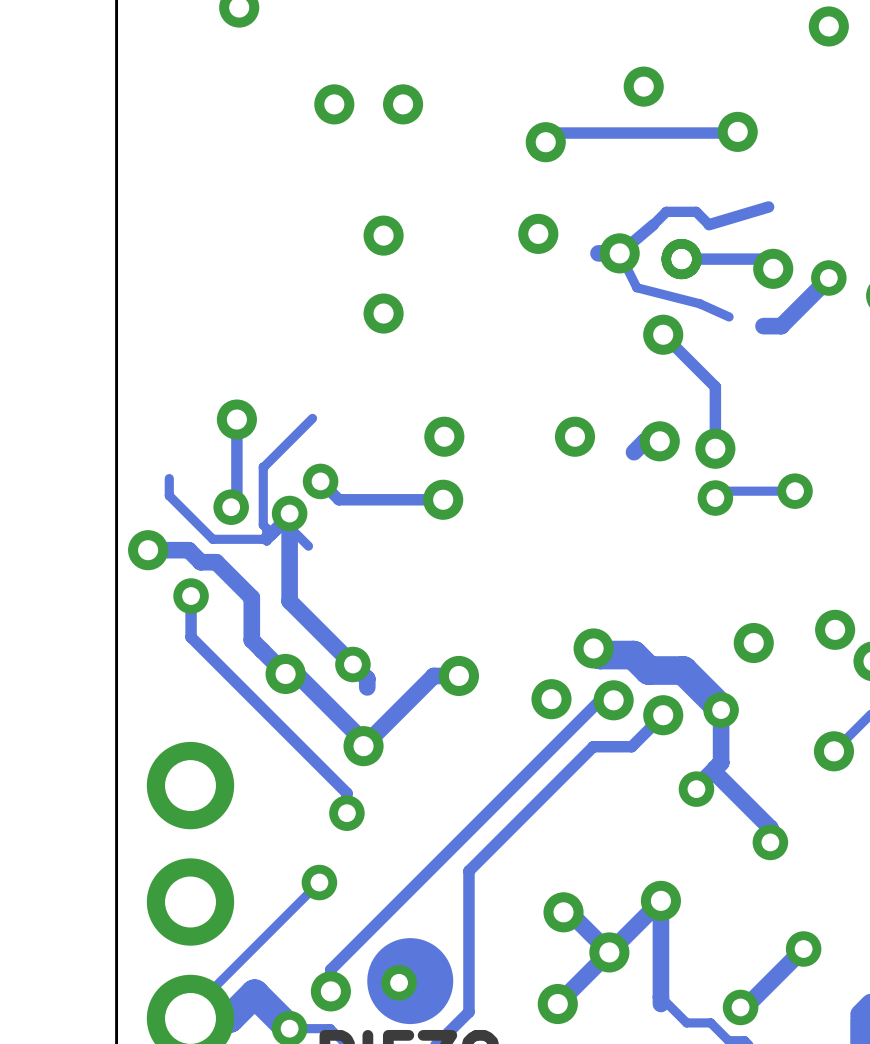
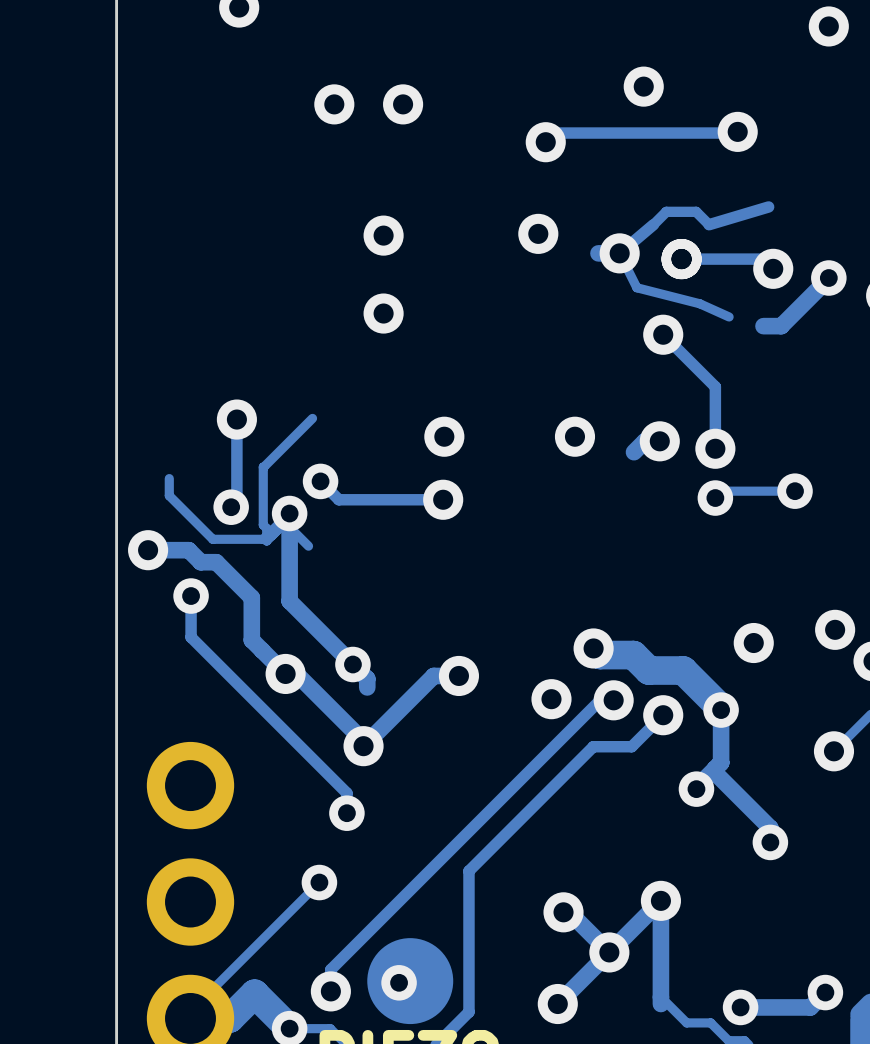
track: (803, 949) (745, 1007) -> (825, 992) (810, 1007) (745, 1007)
via position: (803, 949) -> (825, 992)

